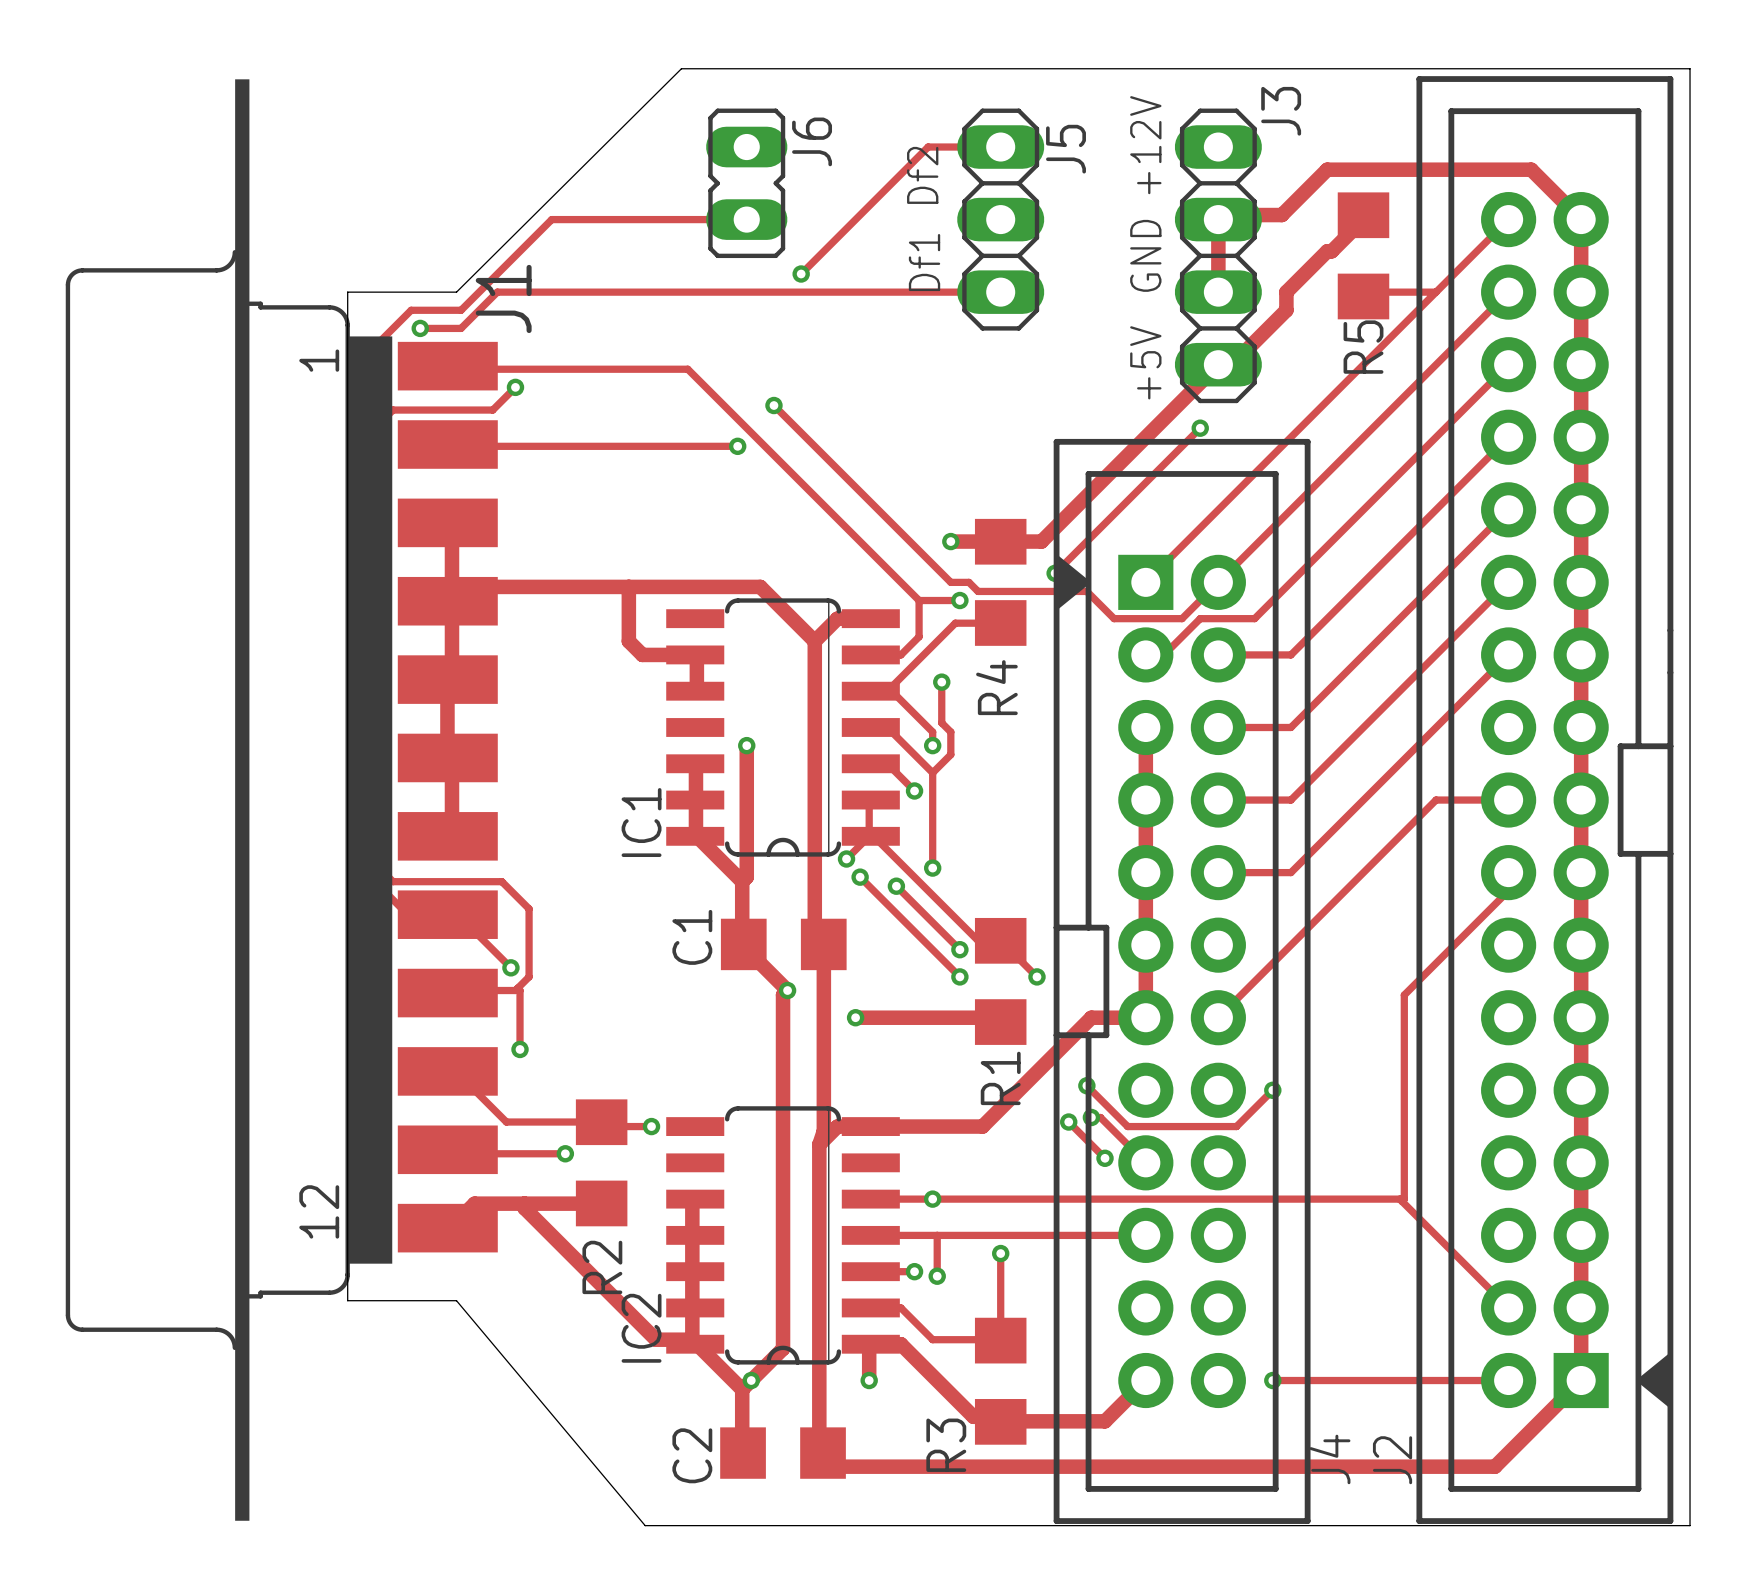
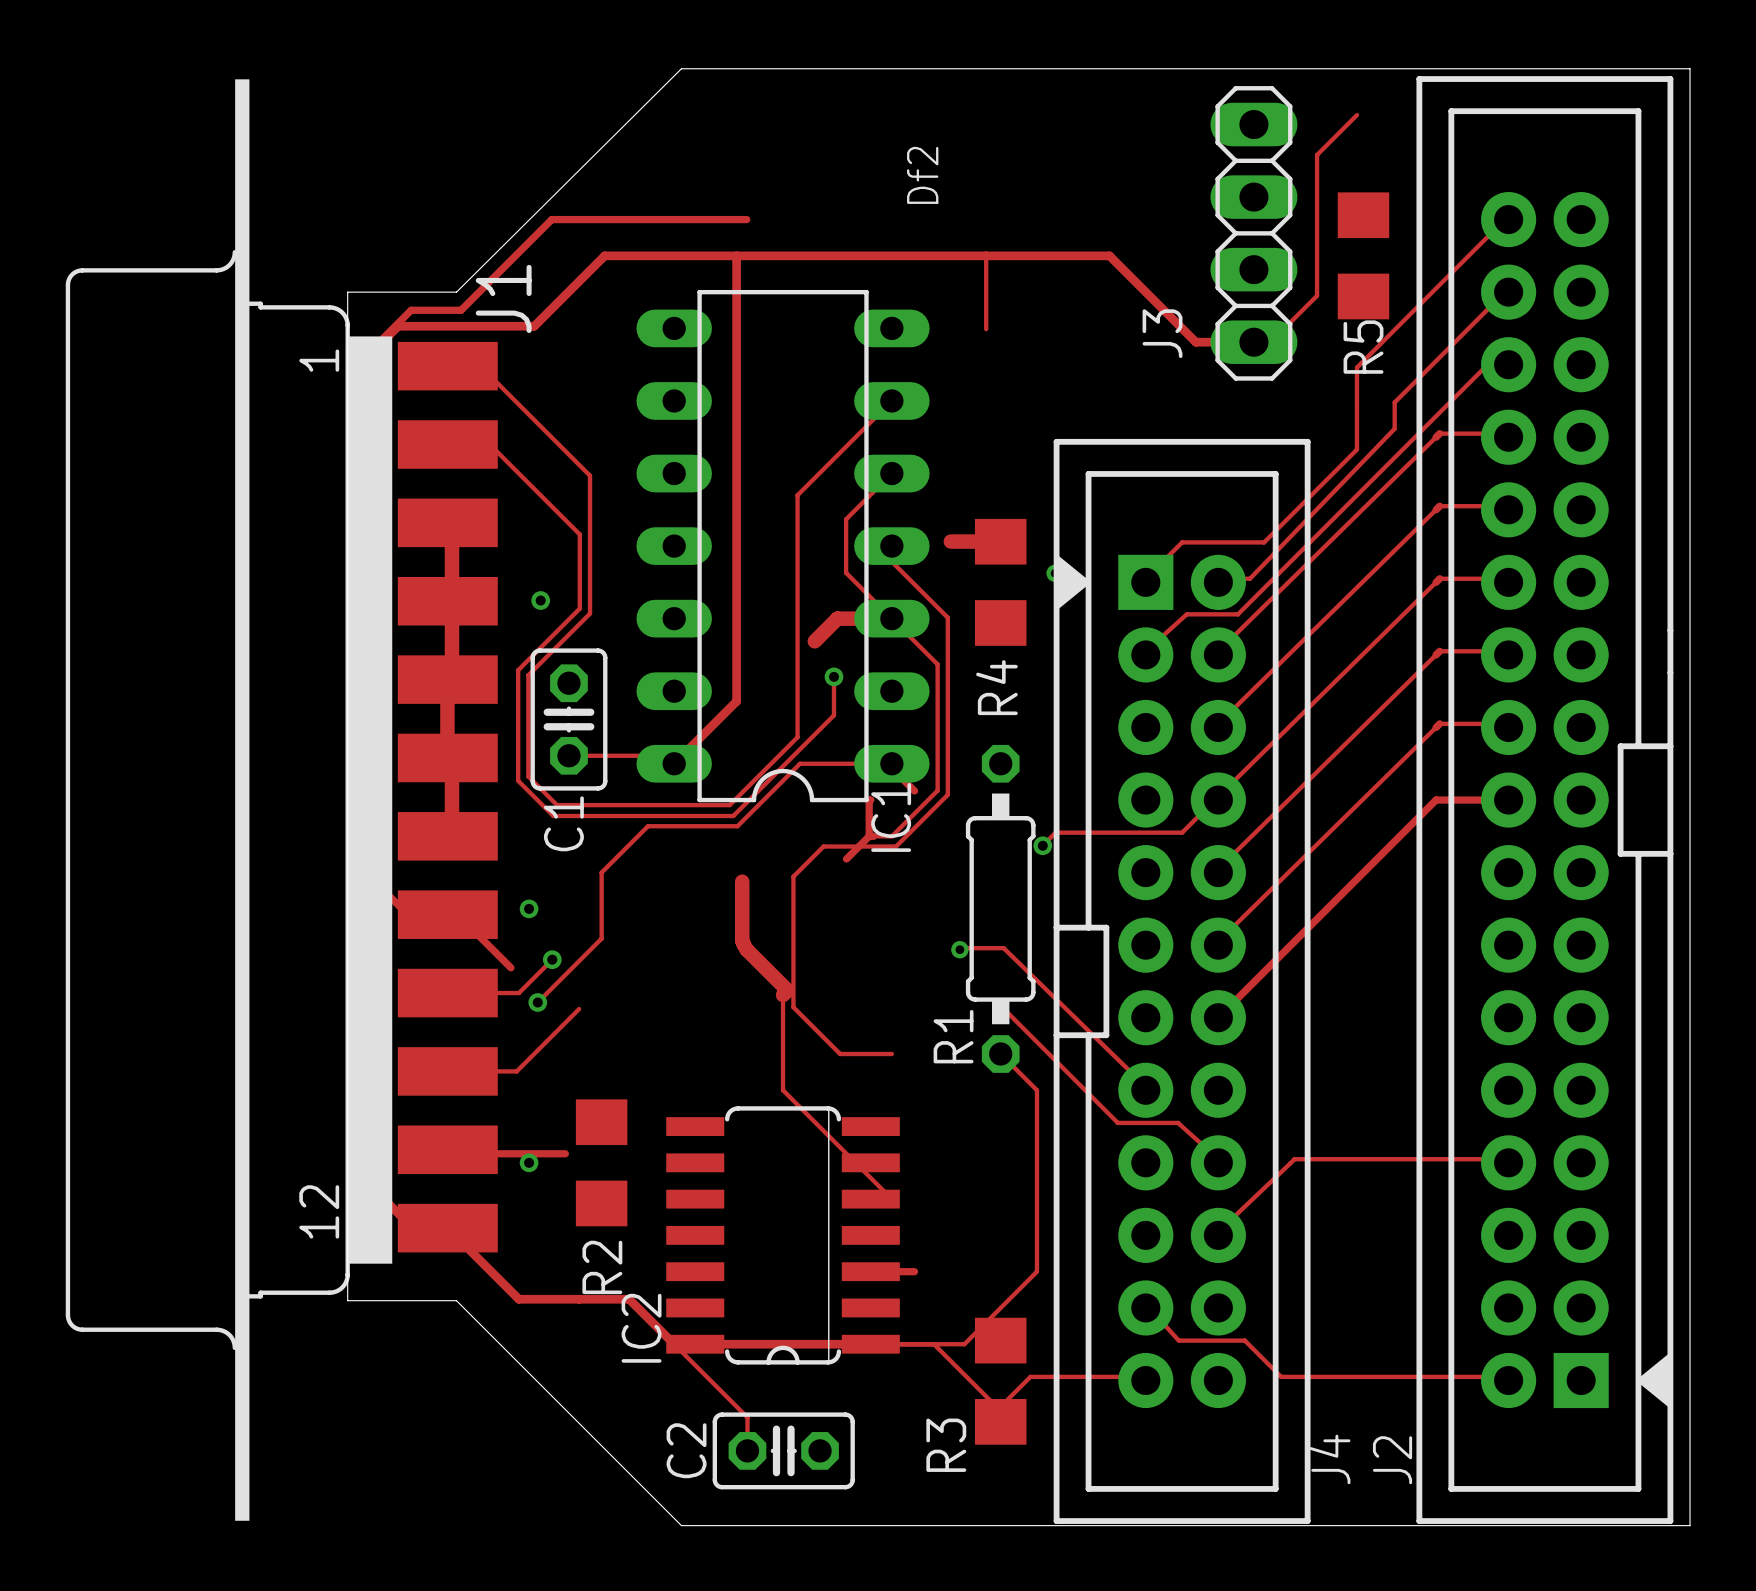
J3 name position: J3 (1281, 111) -> J3 (1162, 333)
track: none -> (1356, 115) (1317, 155) (1317, 295) (1270, 342) (1195, 342) (1109, 255) (604, 255) (534, 326) (398, 326) (381, 343) (381, 1196) (412, 1228) (447, 1228) (518, 1299) (629, 1299) (674, 1344)
text: +12V (1145, 145) -> none
track: (1000, 147) (928, 147) (801, 274) -> none
J6: (746, 183) -> none
track: (1363, 215) (1363, 219) (1331, 251) (1327, 251) (1286, 292) (1286, 310) (1236, 360) (1222, 360) (1041, 541) (1000, 541) -> none
track: none -> (1508, 215) (1356, 367) (1356, 449) (1264, 542) (1182, 542) (1145, 578)
J5: (1000, 219) -> none
track: (1508, 219) (1145, 582) -> none
track: none -> (736, 255) (736, 701) (674, 763) (666, 755) (568, 755)
track: none -> (986, 255) (986, 329)
text: GND (1145, 255) -> none
J3 position: (1218, 255) -> (1253, 233)
text: Df1 (924, 262) -> none
via: (801, 274) -> none
track: none -> (1508, 288) (1394, 402) (1394, 428) (1249, 578) (1218, 578)
track: (1000, 292) (497, 292) (461, 328) (420, 328) -> none
track: (1218, 292) (1218, 219) (1222, 215) (1281, 215) (1327, 169) (1531, 169) (1581, 219) (1581, 1380) (1495, 1466) (837, 1466) (823, 1453) (819, 1453) (819, 1144) -> none
track: (1436, 292) (1363, 292) (1363, 296) -> none
track: (1508, 292) (1182, 618) (1114, 618) (1086, 591) (978, 591) (968, 582) (950, 582) (773, 405) -> none
via: (420, 328) -> none
track: none -> (1508, 361) (1491, 361) (1237, 614) (1186, 614) (1145, 651)
text: +5V (1145, 362) -> none
track: (1508, 364) (1439, 433) -> (1508, 433) (1439, 433)
track: (447, 366) (451, 369) (687, 369) (919, 600) -> (447, 366) (480, 366) (590, 475) (590, 613) (528, 675) (528, 776) (557, 805) (729, 805) (797, 737) (797, 495) (891, 400)
track: (515, 387) (492, 410) (393, 410) (379, 423) (379, 868) (393, 881) (501, 881) (529, 908) (529, 976) (515, 990) (451, 990) (447, 993) -> (552, 959) (518, 993) (447, 993)
via: (515, 387) -> none
via: (773, 405) -> none
track: (1200, 428) (1055, 573) -> none
via: (1200, 428) -> none
track: (1436, 437) (1254, 618) (1200, 618) (1163, 654) (1145, 654) -> (1436, 437) (1218, 651)
track: (1508, 437) (1439, 506) -> (1508, 506) (1439, 506)
track: (447, 444) (451, 446) (737, 446) -> (447, 444) (489, 444) (579, 534) (579, 608) (518, 670) (518, 780) (553, 816) (733, 816) (833, 715) (833, 676)
via: (737, 446) -> none
track: (1436, 509) (1290, 654) (1218, 654) -> (1436, 509) (1218, 723)
track: (1508, 509) (1439, 578) -> (1508, 578) (1439, 578)
via: (950, 541) -> none
track: none -> (891, 546) (891, 561) (947, 617) (947, 794) (896, 846) (823, 846) (793, 876) (793, 1007) (840, 1054) (891, 1054)
track: (1436, 582) (1290, 727) (1218, 727) -> (1436, 582) (1182, 832) (1055, 832) (1042, 845)
track: (1508, 582) (1439, 651) -> (1508, 651) (1439, 651)
track: (628, 586) (628, 641) (642, 654) (696, 654) (696, 691) -> none
IC1 footprint: [666, 598, 900, 857] -> [636, 289, 930, 803]
via: none -> (540, 600)
track: (919, 600) (919, 636) (900, 654) (870, 654) -> none
track: (919, 600) (959, 600) -> none
via: (959, 600) -> none
track: (447, 601) (456, 586) (760, 586) (814, 641) (814, 936) (823, 945) (823, 1131) (819, 1144) -> none
track: (1000, 623) (955, 623) (887, 691) -> none
track: (1436, 654) (1290, 800) (1218, 800) -> (1436, 654) (1218, 868)
track: (1508, 654) (1439, 723) -> (1508, 723) (1439, 723)
via: none -> (833, 676)
track: (941, 682) (941, 722) (950, 732) (950, 754) (932, 772) -> none
via: (941, 682) -> none
track: (870, 691) (891, 691) (932, 732) (932, 745) -> none
track: (870, 727) (887, 727) (932, 772) -> none
track: (1145, 727) (1145, 1017) (1091, 1017) (982, 1126) (837, 1126) (819, 1144) -> none
track: (1436, 727) (1290, 872) (1218, 872) -> (1436, 727) (1218, 941)
track: (746, 745) (746, 877) (742, 881) (695, 836) -> none
via: (746, 745) -> none
via: (932, 745) -> none
track: none -> (870, 763) (799, 763) (737, 826) (648, 826) (601, 872) (601, 938) (537, 1002)
track: (695, 771) (695, 829) -> none
track: (932, 772) (932, 868) -> none
via: (914, 790) -> none
IC1 name position: IC1 (641, 822) -> IC1 (891, 817)
track: (873, 836) (978, 940) (1000, 940) (1036, 976) -> (873, 836) (891, 836) (937, 790) (937, 664) (846, 572) (846, 519) (891, 473)
via: none -> (1042, 845)
via: (846, 859) -> none
via: (932, 868) -> none
track: (1508, 872) (1508, 890) (1404, 995) (1404, 1199) (1402, 1201) -> none
track: (860, 877) (959, 976) -> none
via: (860, 877) -> none
track: (896, 886) (959, 949) -> none
via: (896, 886) -> none
via: none -> (529, 908)
R1 footprint: [974, 917, 1027, 1045] -> [965, 744, 1036, 1073]
C1 footprint: [720, 918, 847, 971] -> [530, 648, 608, 791]
C1 name position: C1 (692, 937) -> C1 (563, 823)
track: none -> (961, 948) (1003, 948) (1145, 1086)
via: none -> (552, 959)
via: (510, 967) -> none
via: (959, 976) -> none
via: (1036, 976) -> none
track: (517, 988) (520, 990) (520, 1049) -> none
via: (787, 990) -> none
track width: thick (783, 995) (783, 1090) -> thin (783, 995) (783, 1090)
via: none -> (537, 1002)
track: none -> (1006, 1011) (1117, 1122) (1178, 1122) (1218, 1159)
track: (855, 1017) (1000, 1017) (1000, 1022) -> none
via: (855, 1017) -> none
via: (520, 1049) -> none
track: (447, 1071) (451, 1067) (506, 1122) (601, 1122) (601, 1126) (651, 1126) -> (447, 1071) (516, 1071) (579, 1009)
track: (1086, 1085) (1127, 1126) (1236, 1126) (1272, 1090) -> none
via: (1086, 1085) -> none
track: (783, 1090) (783, 1348) (742, 1389) -> (783, 1090) (891, 1199)
via: (1272, 1090) -> none
track: (1091, 1117) (1100, 1117) (1145, 1162) -> none
via: (1091, 1117) -> none
track: (1068, 1122) (1105, 1158) -> none
via: (1068, 1122) -> none
via: (651, 1126) -> none
via: (565, 1153) -> none
via: (1105, 1158) -> none
track: none -> (1508, 1159) (1294, 1159) (1218, 1231)
via: none -> (529, 1162)
track: (692, 1199) (692, 1344) -> none
track: (870, 1199) (1399, 1199) (1508, 1307) -> none
via: (932, 1199) -> none
track: (524, 1203) (524, 1208) (656, 1339) (692, 1339) (695, 1344) -> none
track: (601, 1203) (474, 1203) (447, 1228) -> none
track: (870, 1235) (1145, 1235) -> none
track: (937, 1235) (937, 1276) -> none
track: (1000, 1253) (1000, 1340) -> none
via: (1000, 1253) -> none
via: (914, 1271) -> none
via: (937, 1276) -> none
board edge: (456, 1300) (645, 1525) (681, 1525) -> (456, 1300) (681, 1525)
track: none -> (1145, 1304) (1178, 1340) (1244, 1340) (1281, 1376) (1508, 1376)
track: (870, 1307) (900, 1307) (932, 1339) (1000, 1339) -> none
track: none -> (674, 1344) (747, 1417) (747, 1450)
track: (696, 1344) (742, 1389) -> none
track: (870, 1344) (869, 1380) -> (870, 1344) (674, 1344)
track: (900, 1344) (973, 1416) (996, 1416) (1000, 1421) -> (900, 1344) (964, 1344) (1036, 1271) (1036, 1090) (1000, 1054)
track: none -> (933, 1344) (998, 1408) (1030, 1376) (1145, 1376)
via: (751, 1380) -> none
via: (869, 1380) -> none
track: (1145, 1380) (1105, 1421) (1000, 1421) -> none
track: (1272, 1380) (1508, 1380) -> none
via: (1272, 1380) -> none
track: (742, 1389) (743, 1453) -> none
C2 footprint: [720, 1427, 846, 1479] -> [712, 1412, 855, 1490]

